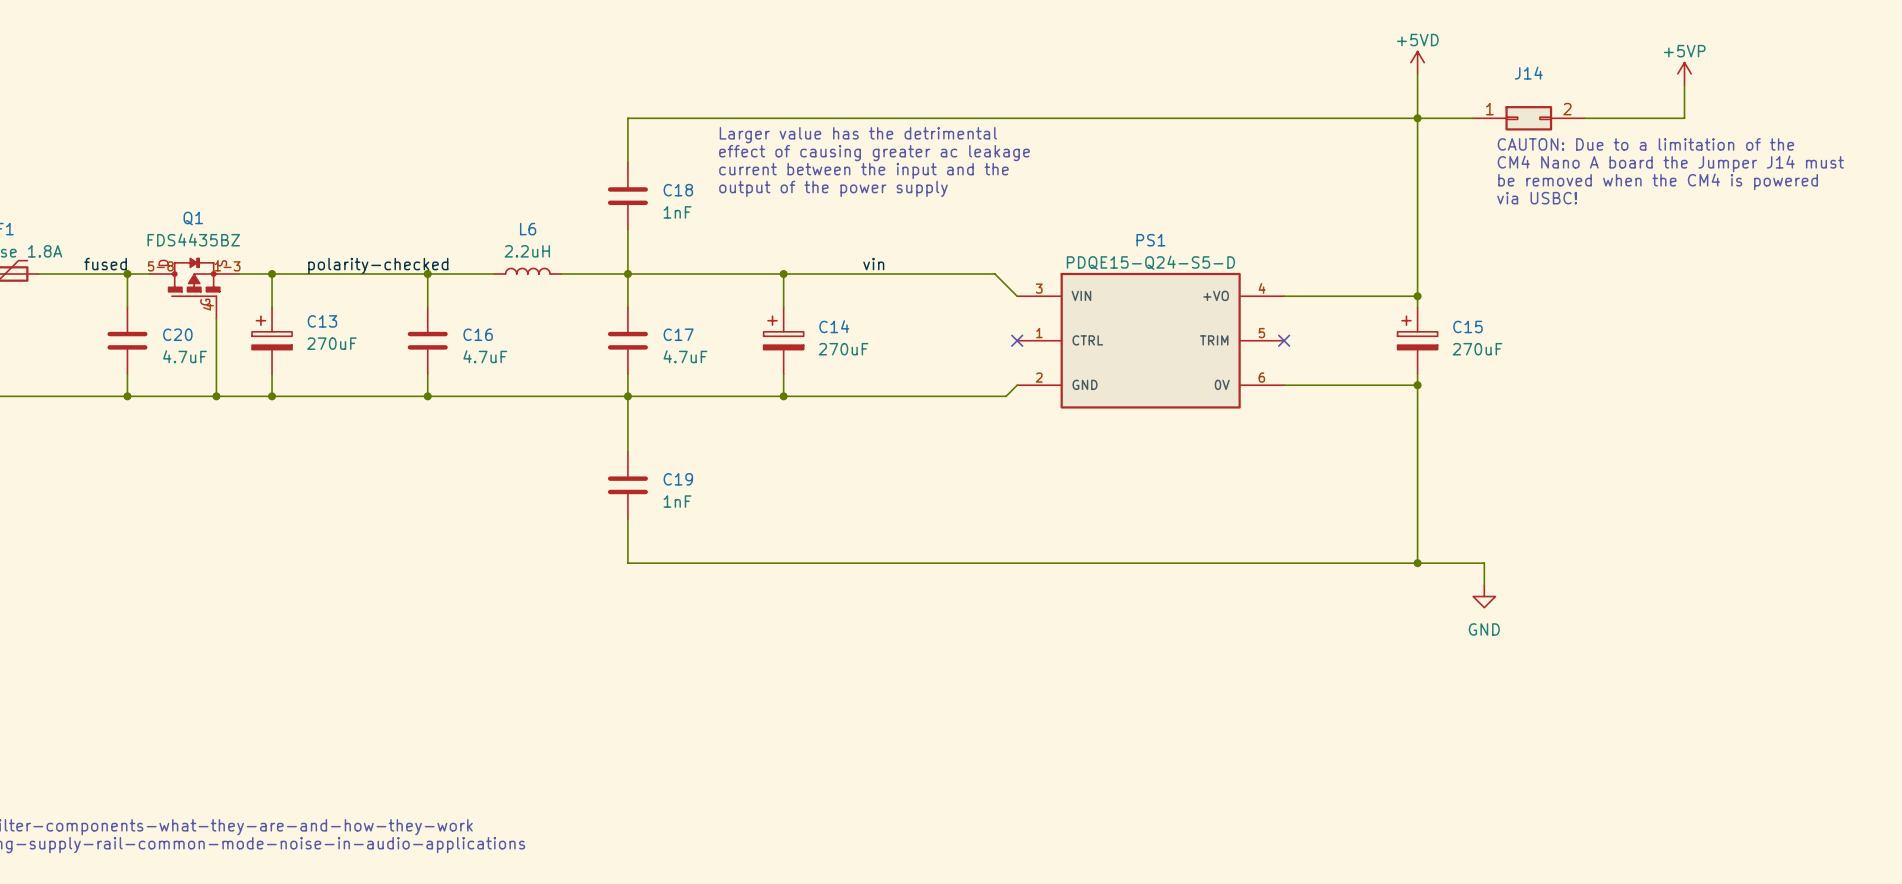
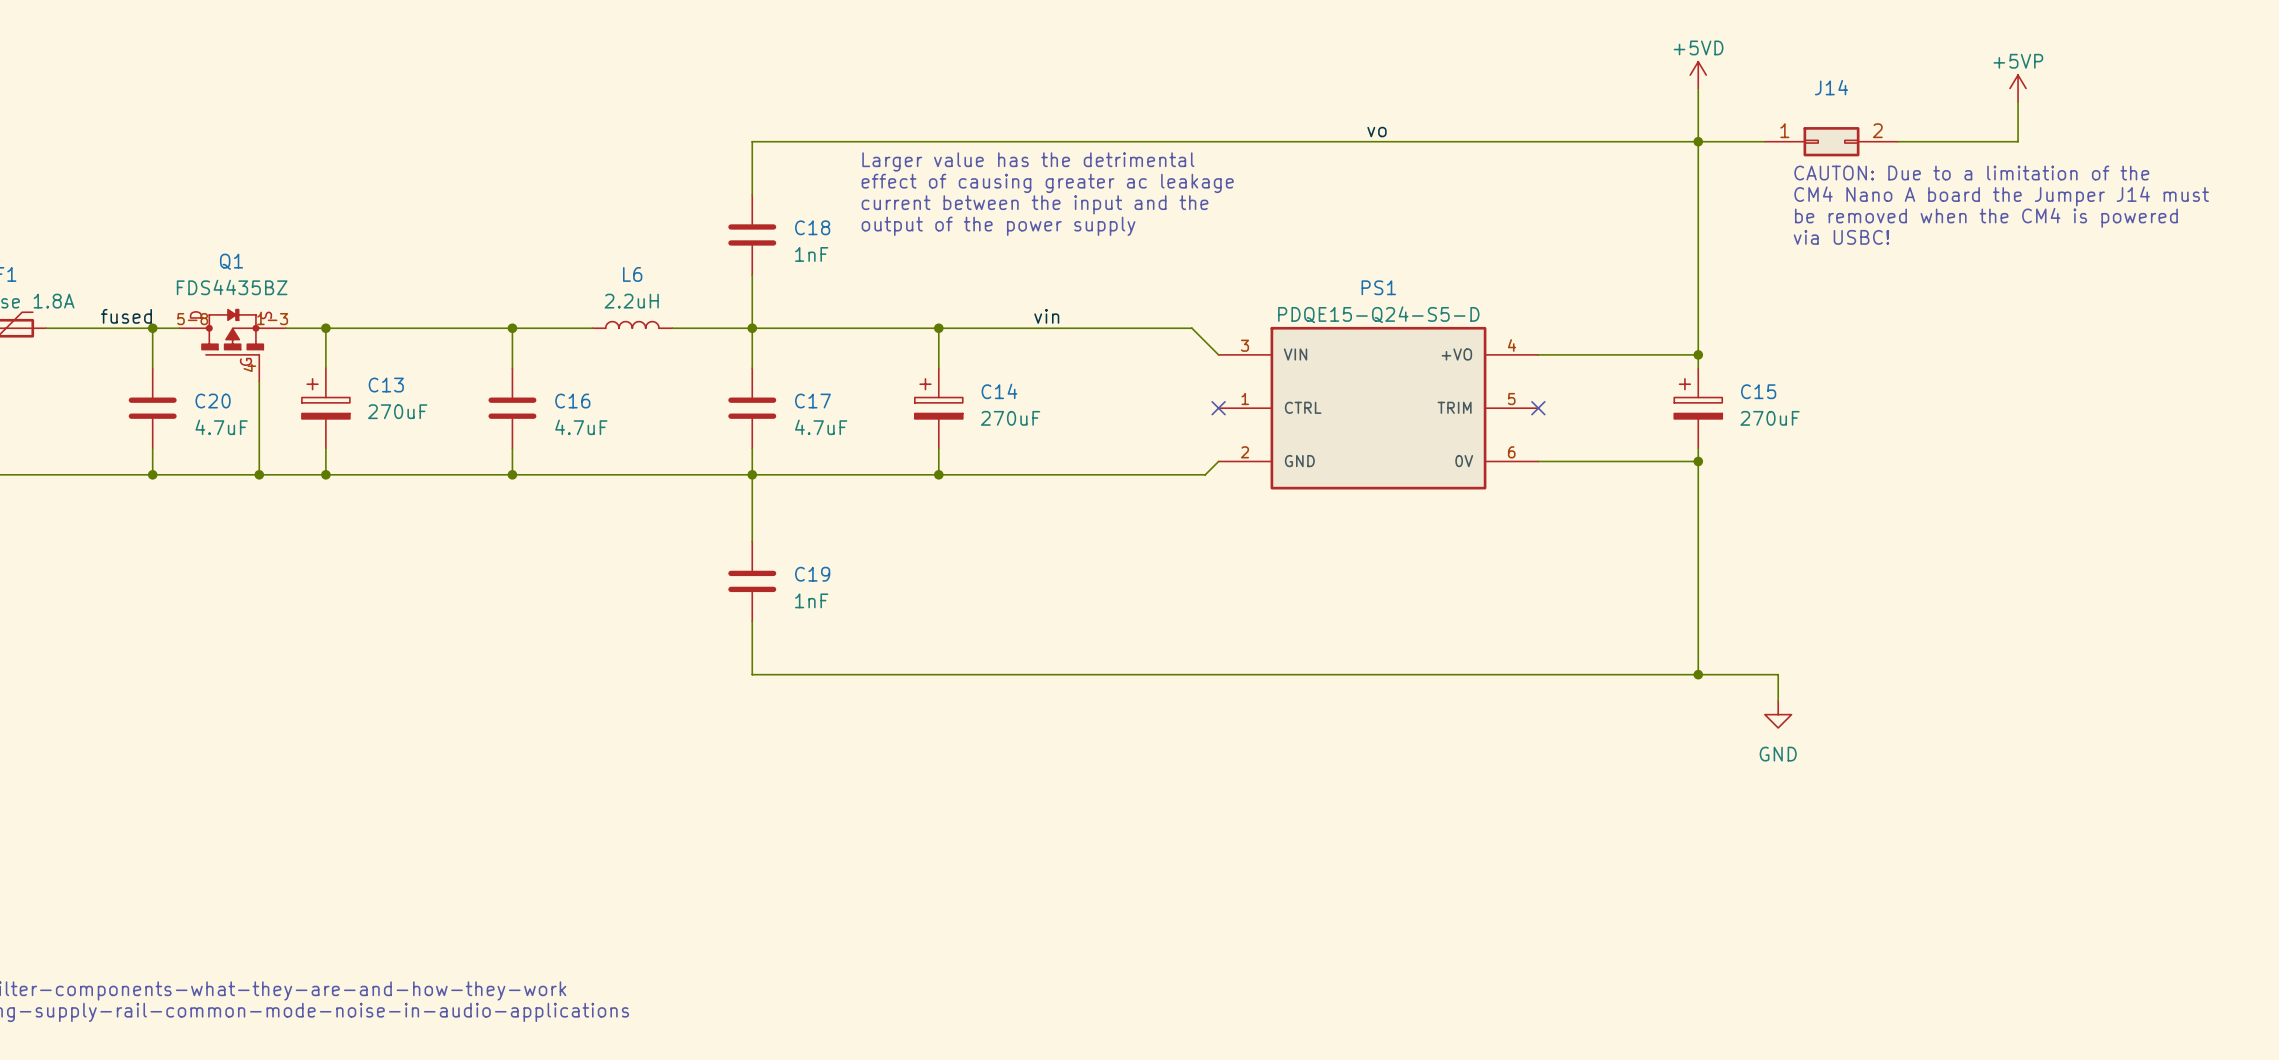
label: none -> vo (1377, 132)
label: polarity-checked (378, 265) -> none

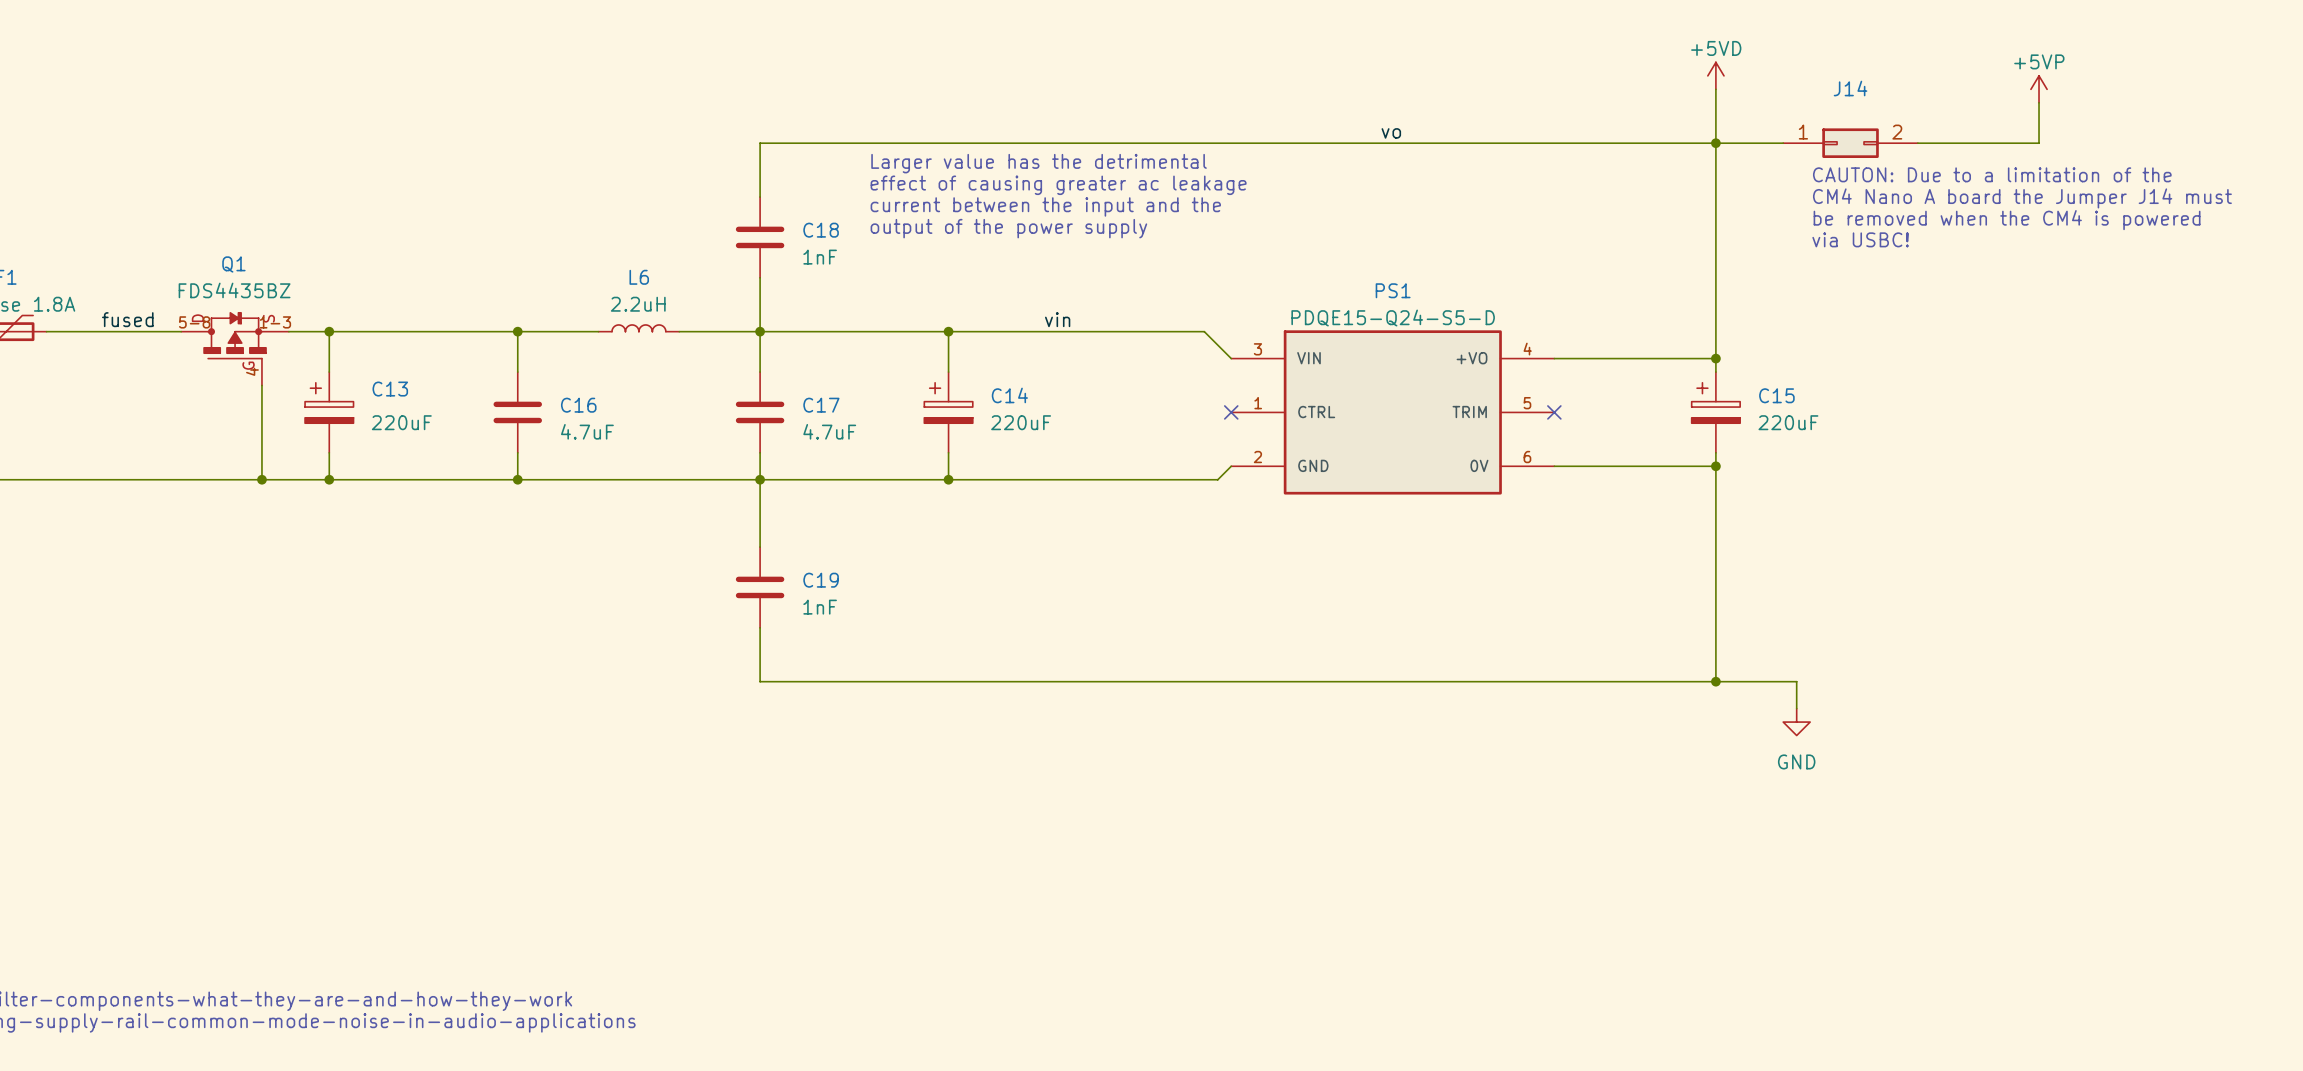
wire: (152, 328) (152, 368) -> none
junction: (152, 328) -> none
C20: 4.7uF (152, 408) -> none
C13 value: 270uF (397, 411) -> 220uF (401, 422)
C14 value: 270uF (1010, 418) -> 220uF (1021, 422)
C15 value: 270uF (1770, 418) -> 220uF (1788, 422)
wire: (152, 448) (152, 474) -> none
junction: (152, 474) -> none

